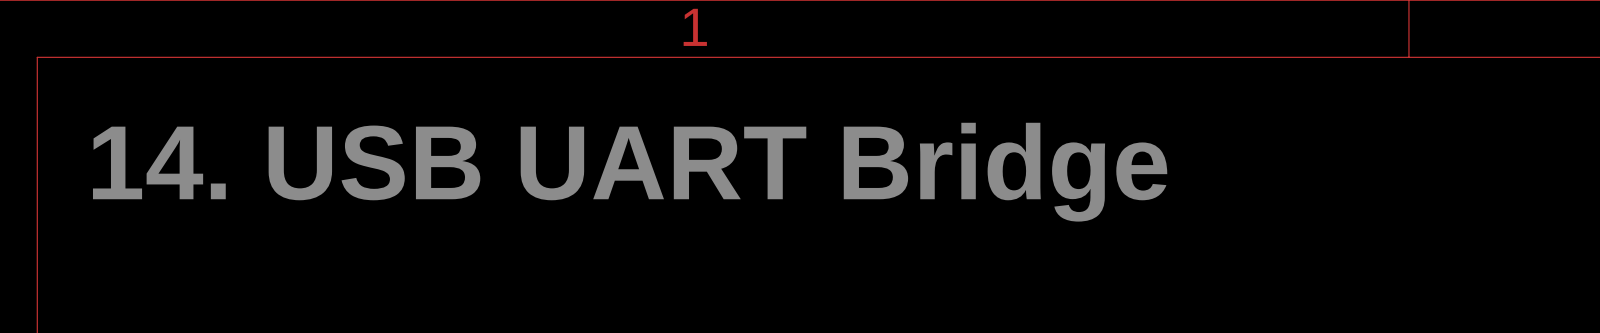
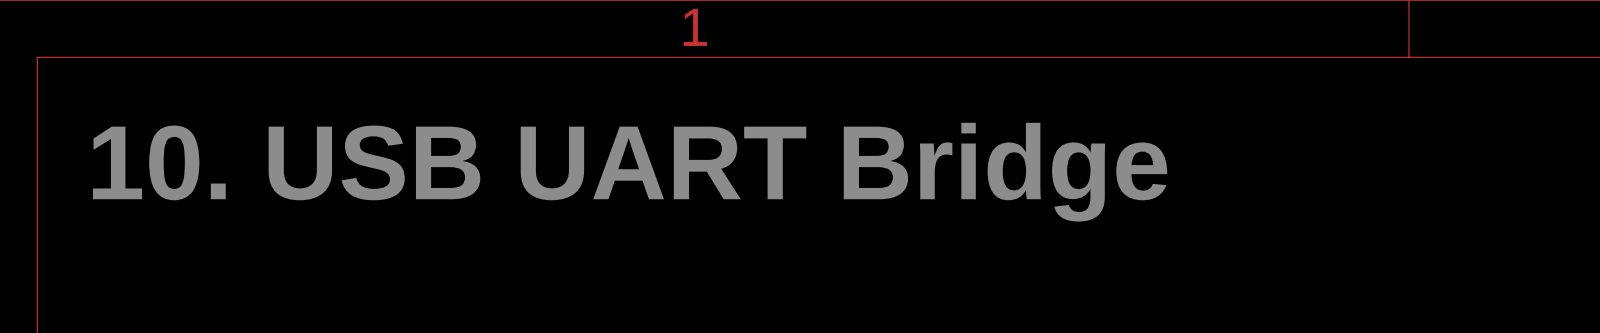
text: 14. USB UART Bridge (630, 172) -> 10. USB UART Bridge (630, 172)

